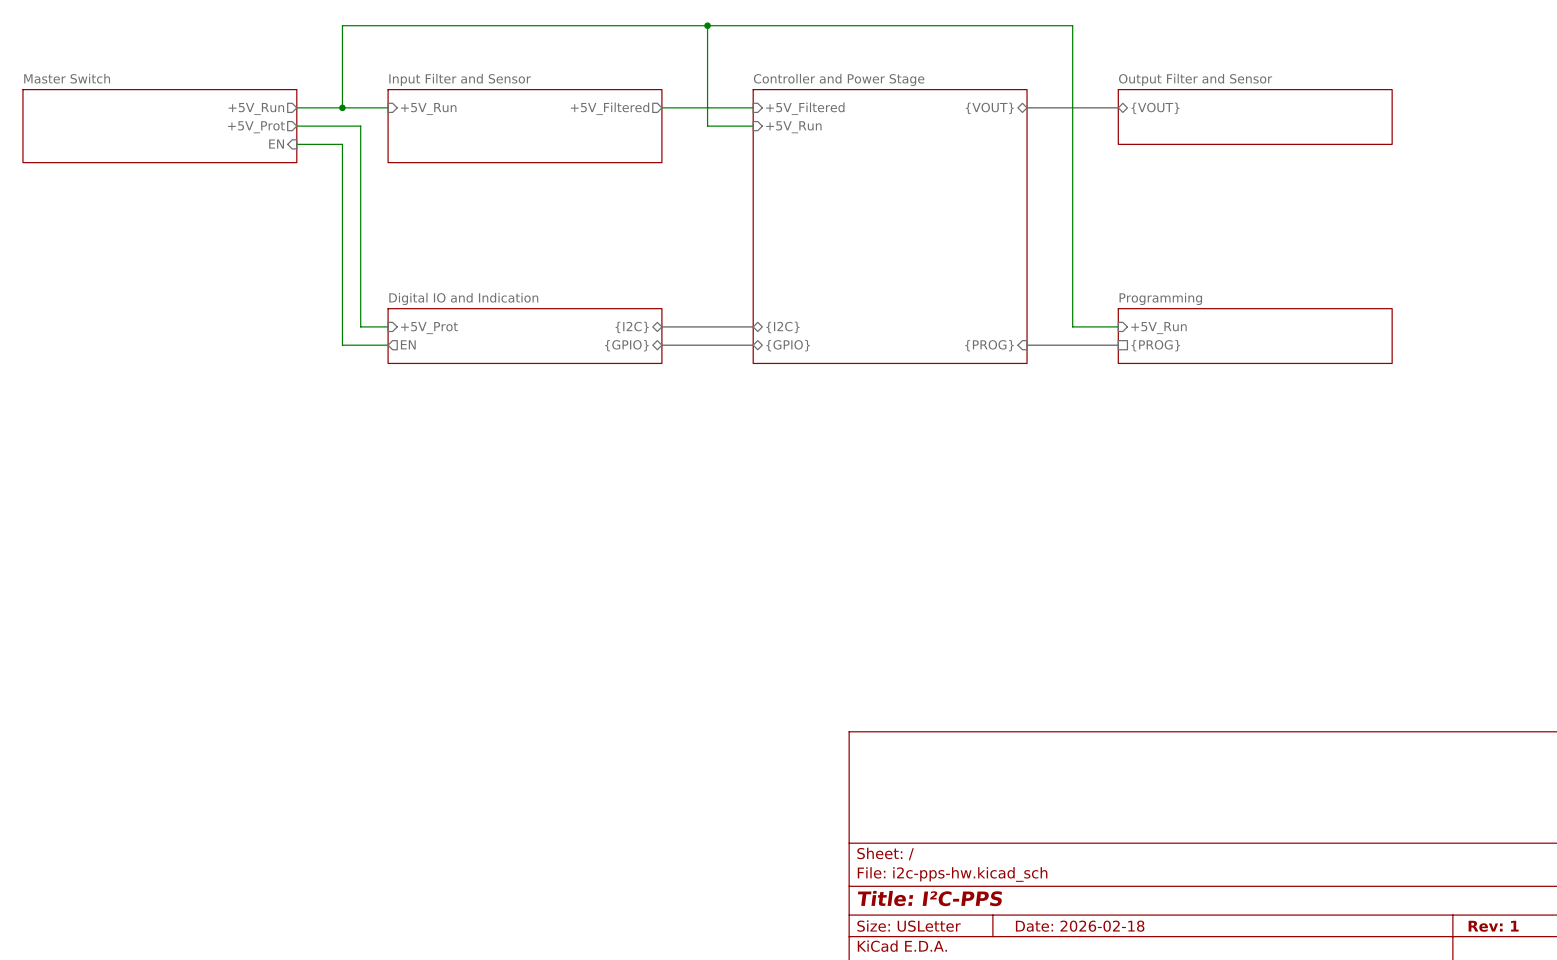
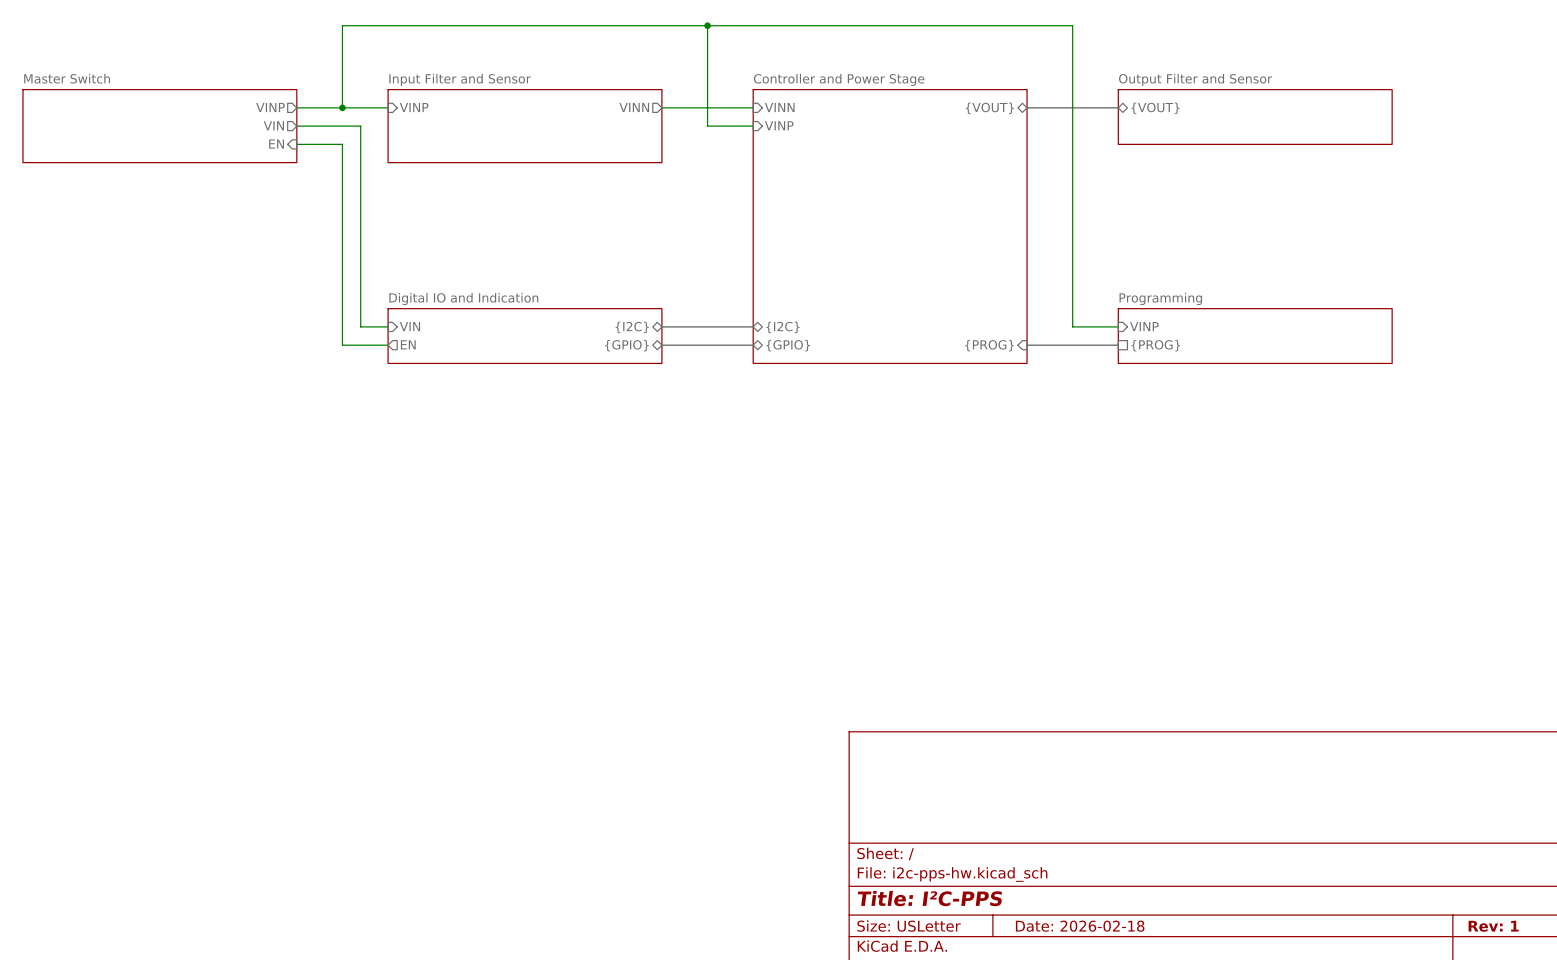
sheet pin: +5V_Run (256, 108) -> VINP (270, 107)
sheet pin: +5V_Run (428, 108) -> VINP (414, 107)
sheet pin: +5V_Filtered (610, 108) -> VINN (634, 107)
sheet pin: +5V_Filtered (805, 108) -> VINN (779, 107)
sheet pin: +5V_Prot (256, 127) -> VIN (273, 125)
sheet pin: +5V_Run (793, 127) -> VINP (779, 125)
sheet pin: +5V_Prot (429, 328) -> VIN (409, 326)
sheet pin: +5V_Run (1158, 328) -> VINP (1144, 326)

